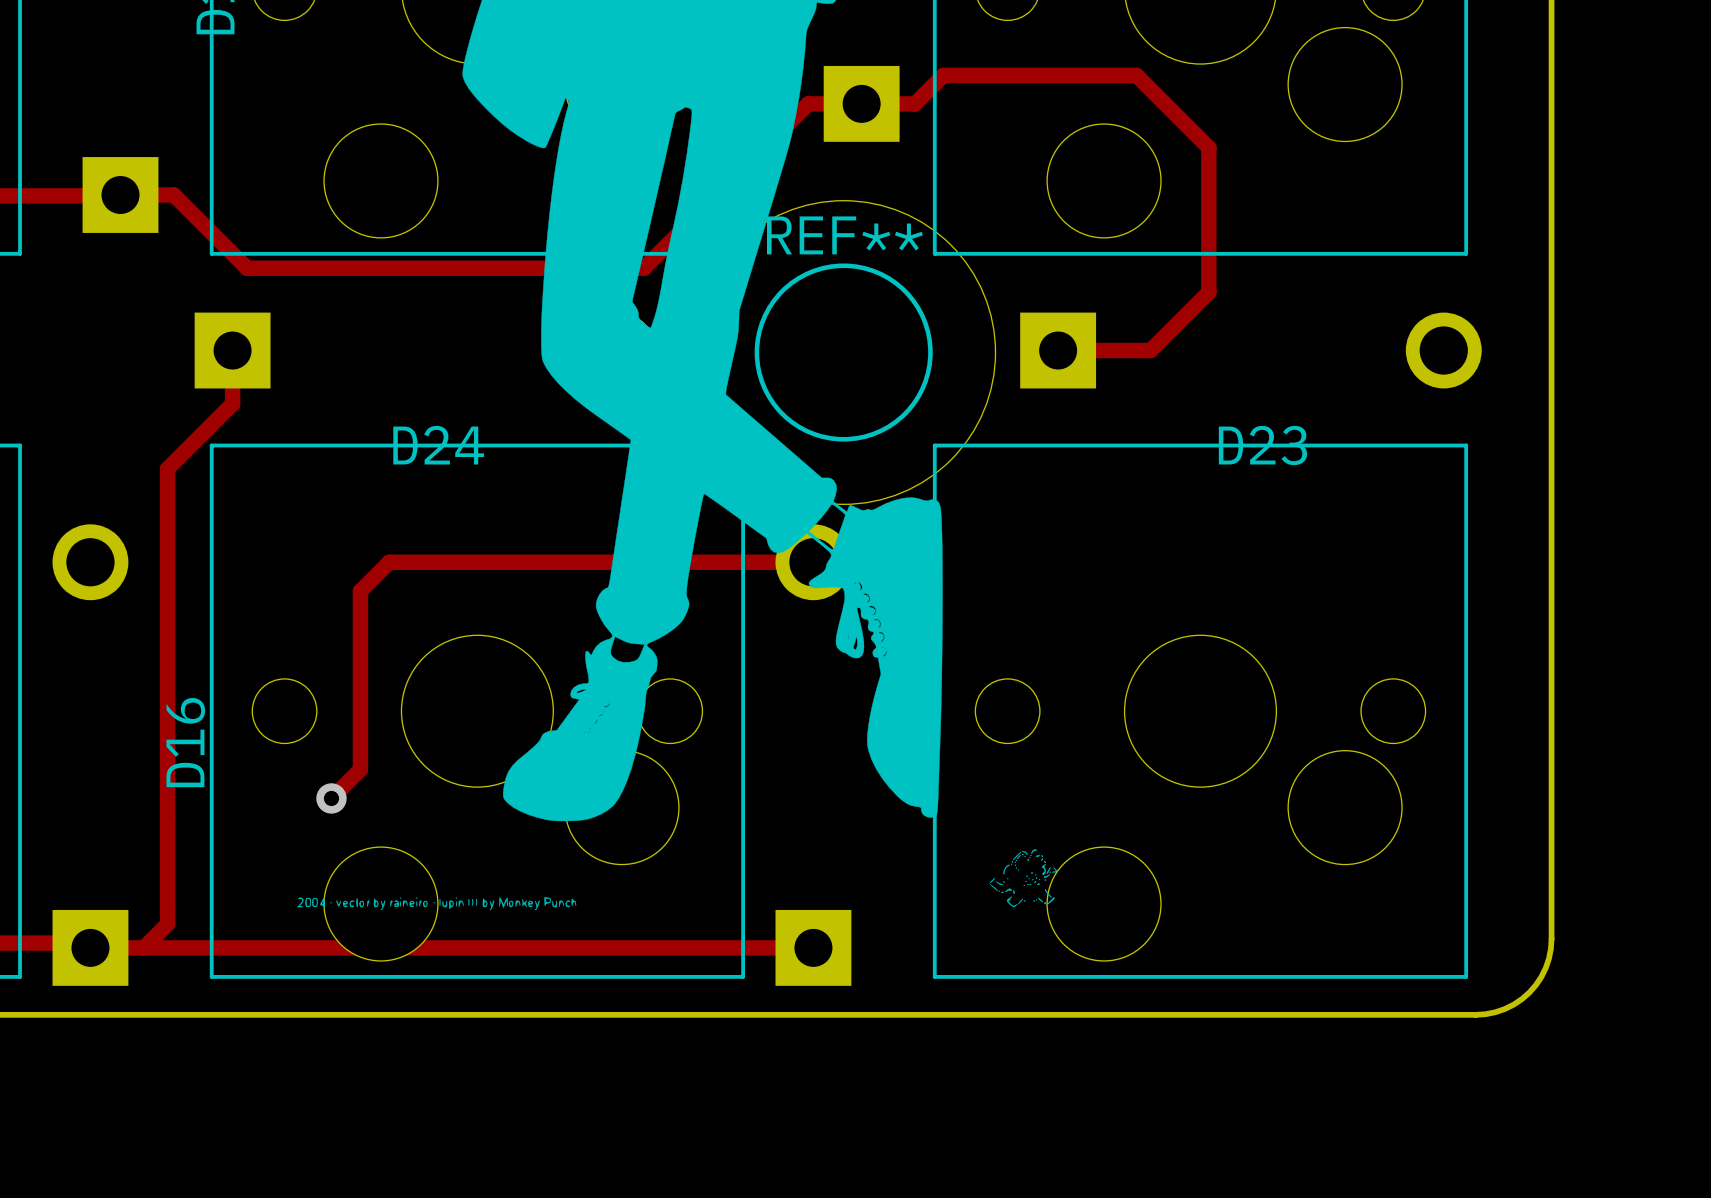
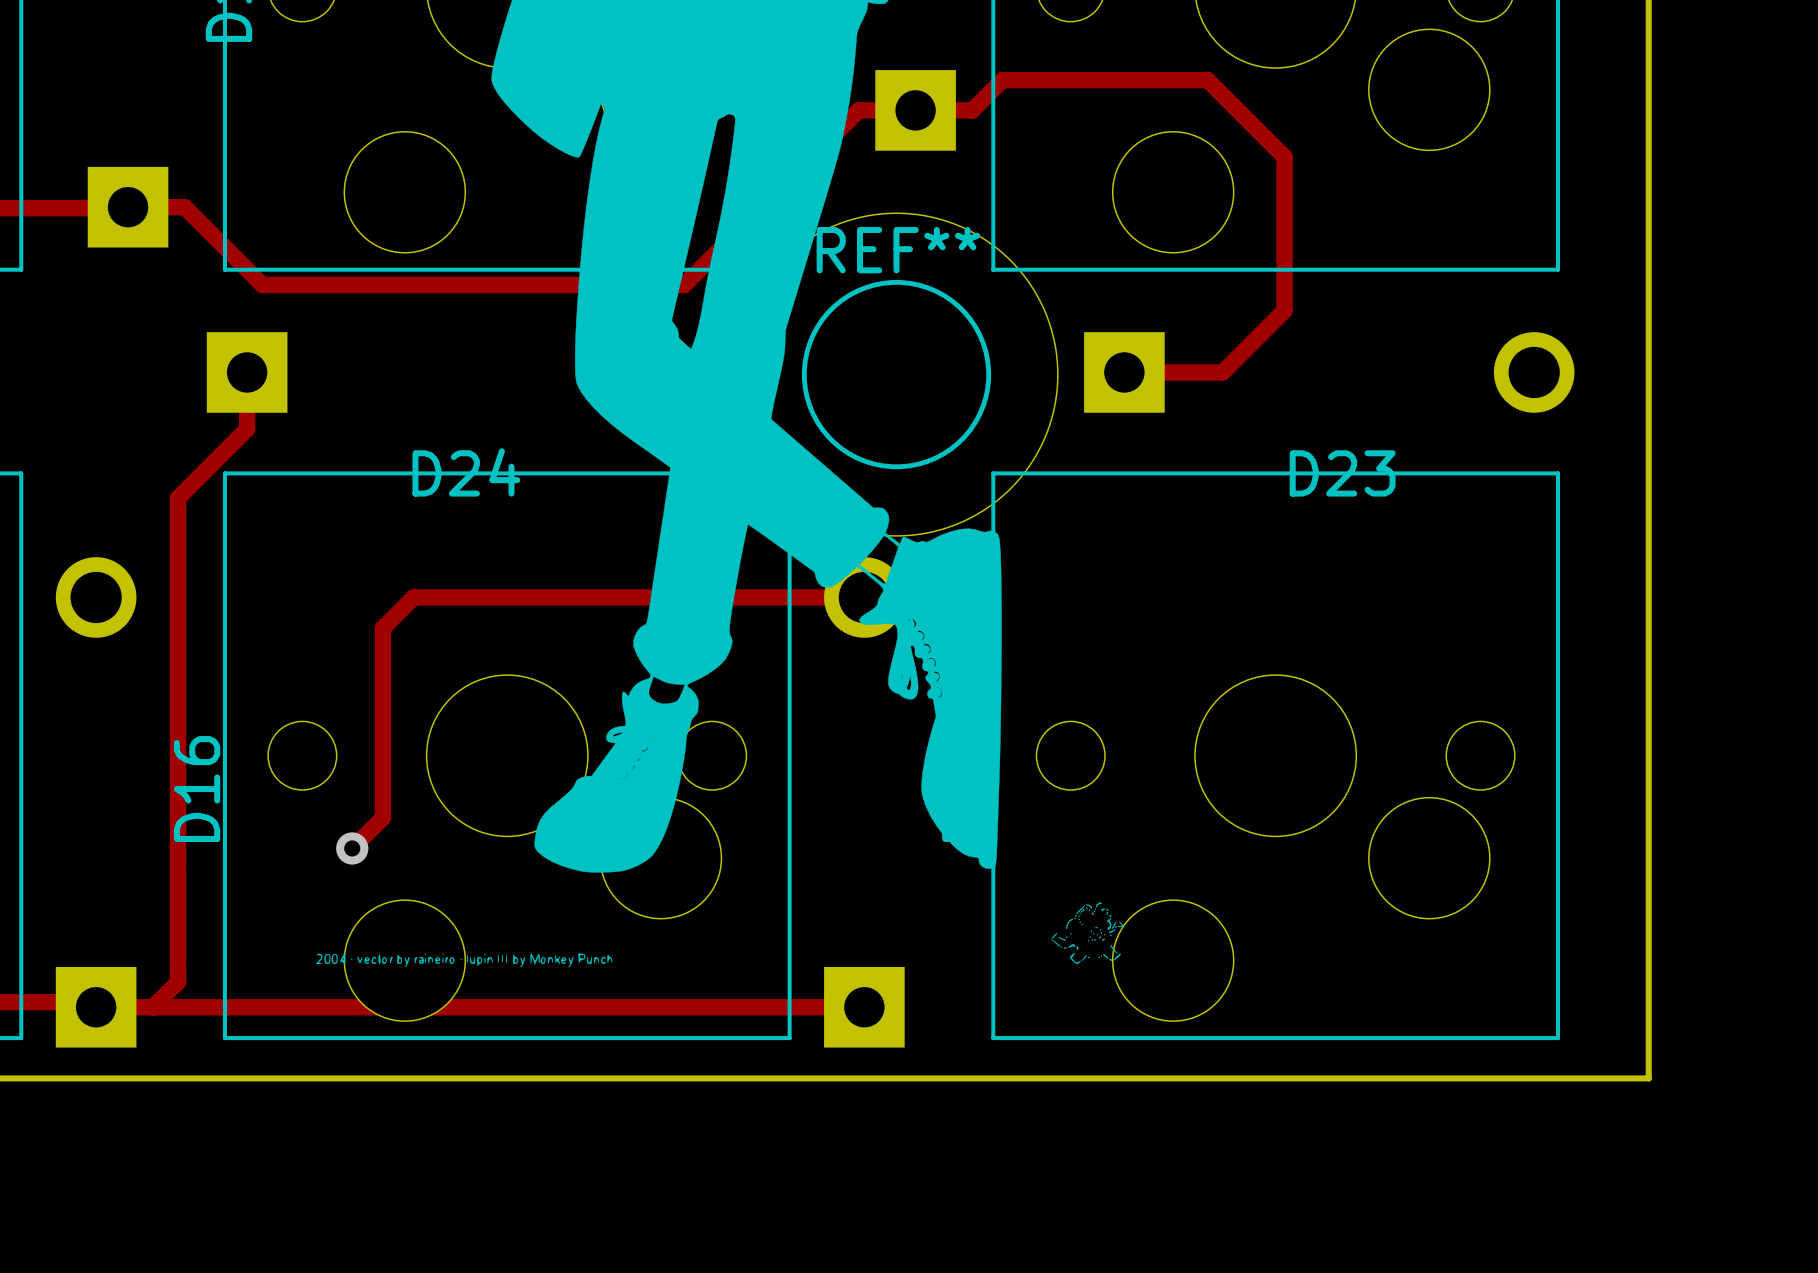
board edge: (1551, 938) (1545, 967) (1529, 992) (1504, 1009) (1475, 1014) -> (1648, 997) (1648, 1078) (1568, 1078)

